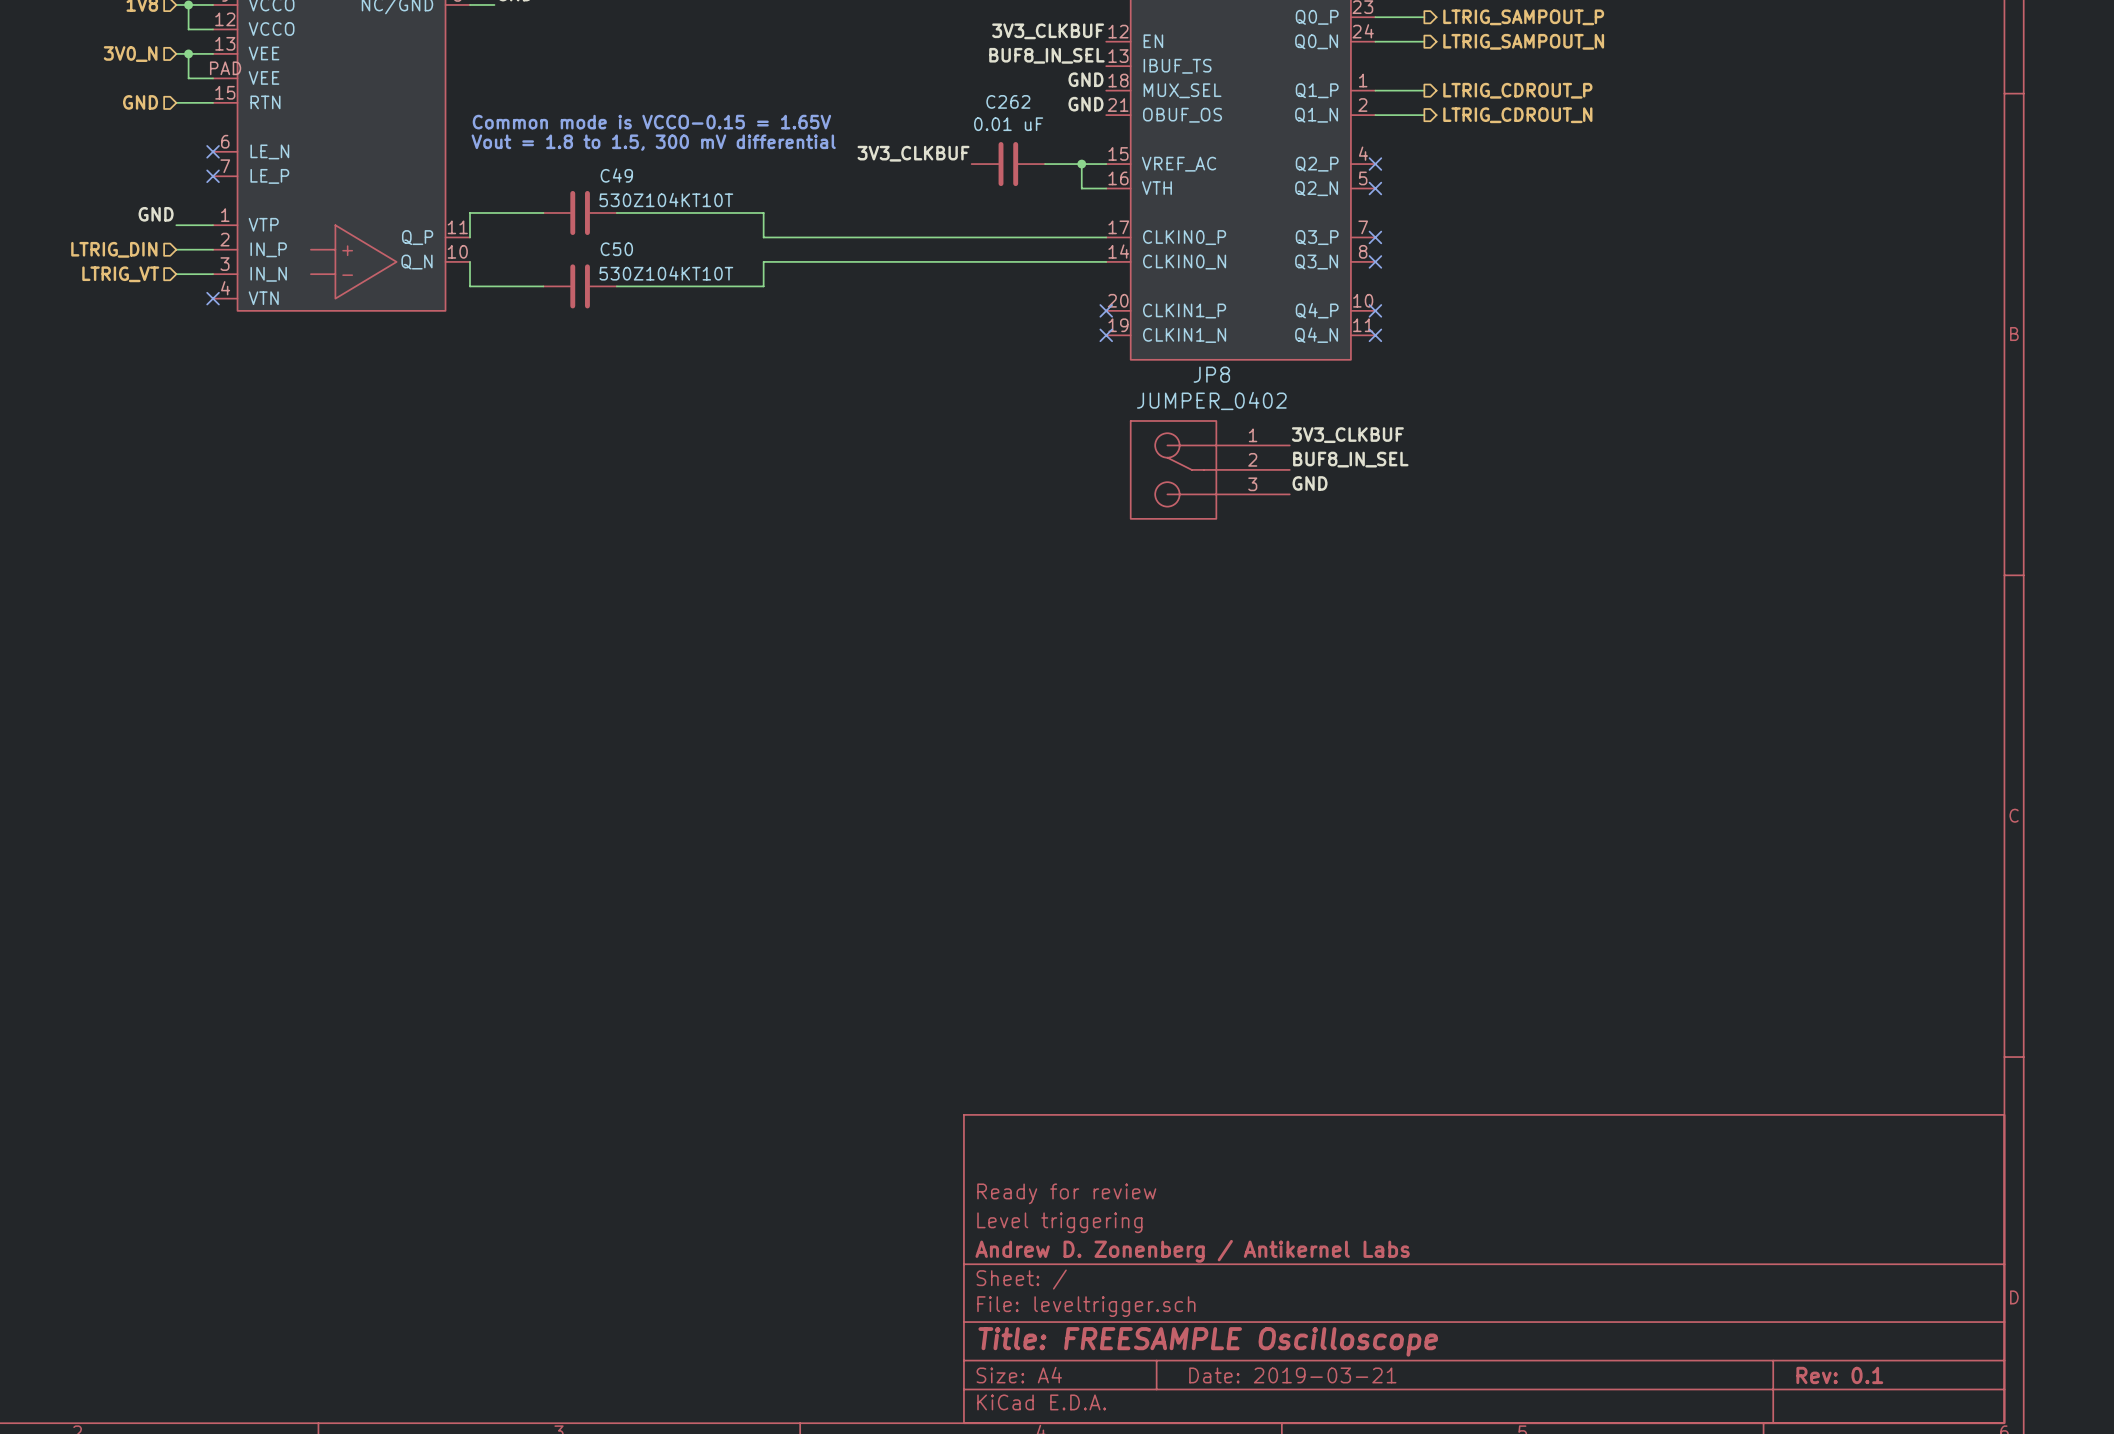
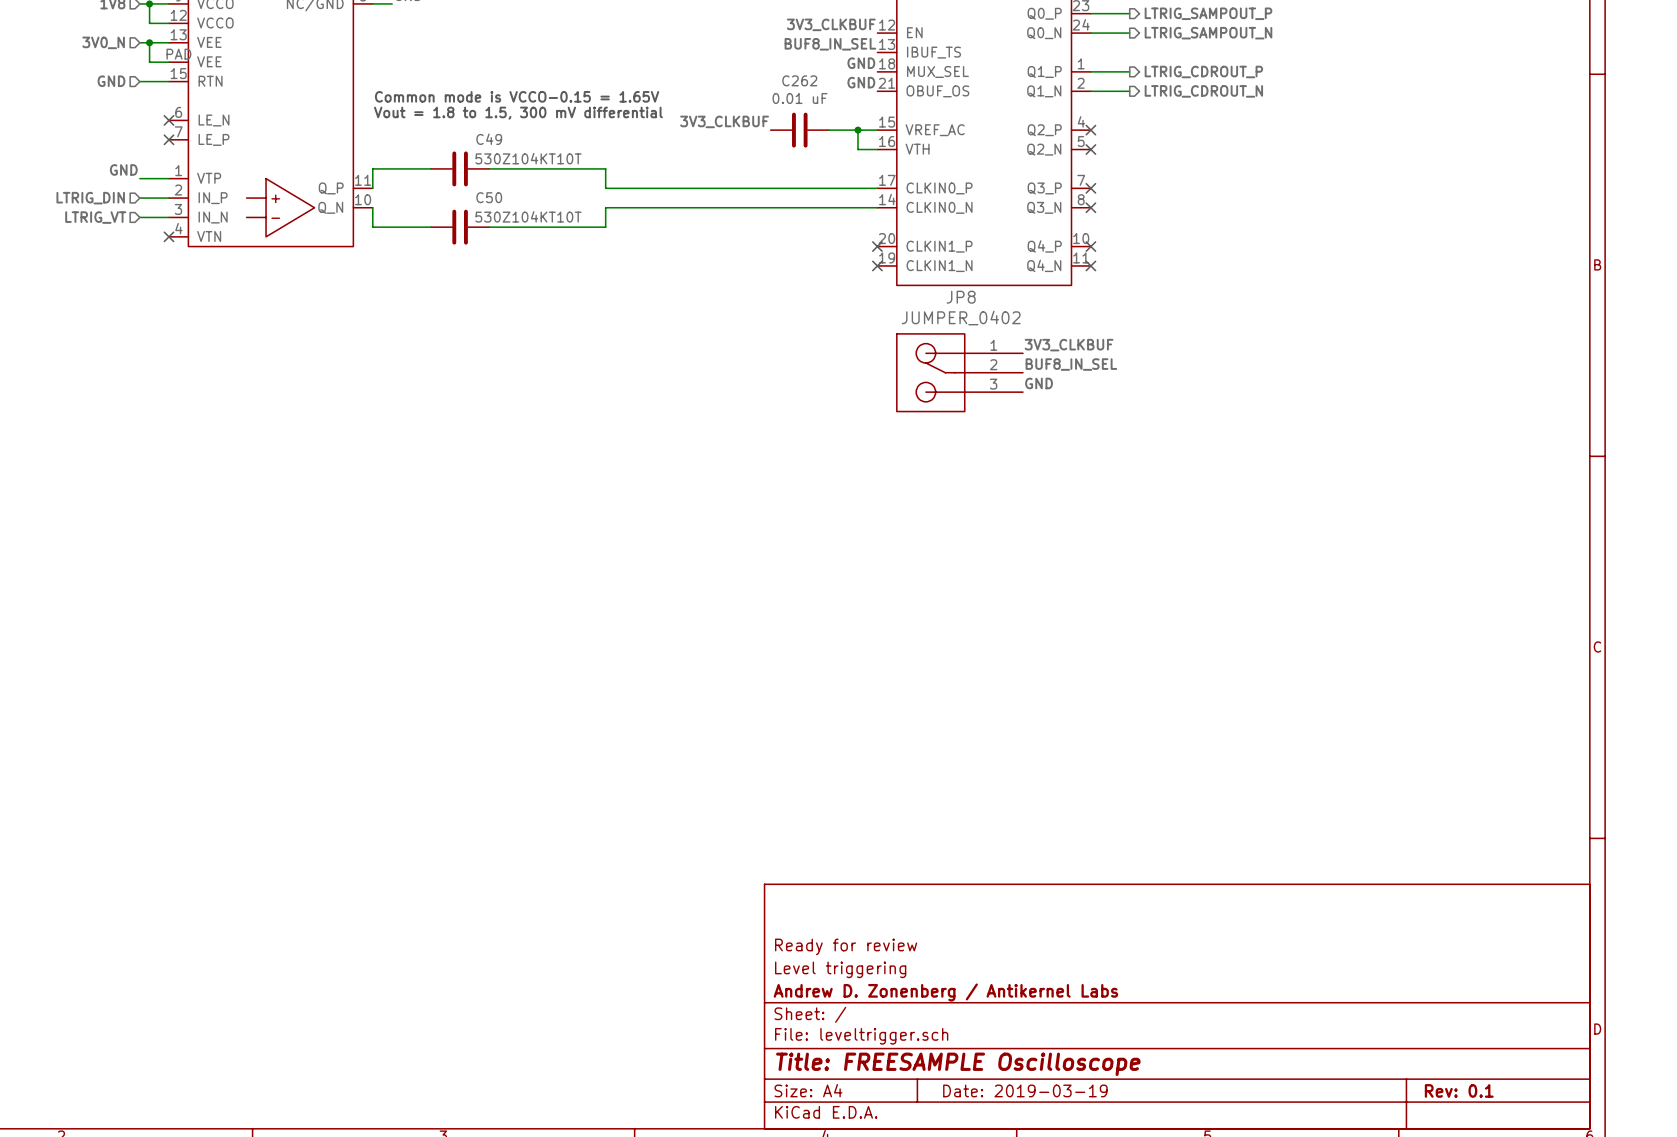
title block: Date: 2019-03-21 (1292, 1375) -> Date: 2019-03-19 (1025, 1090)

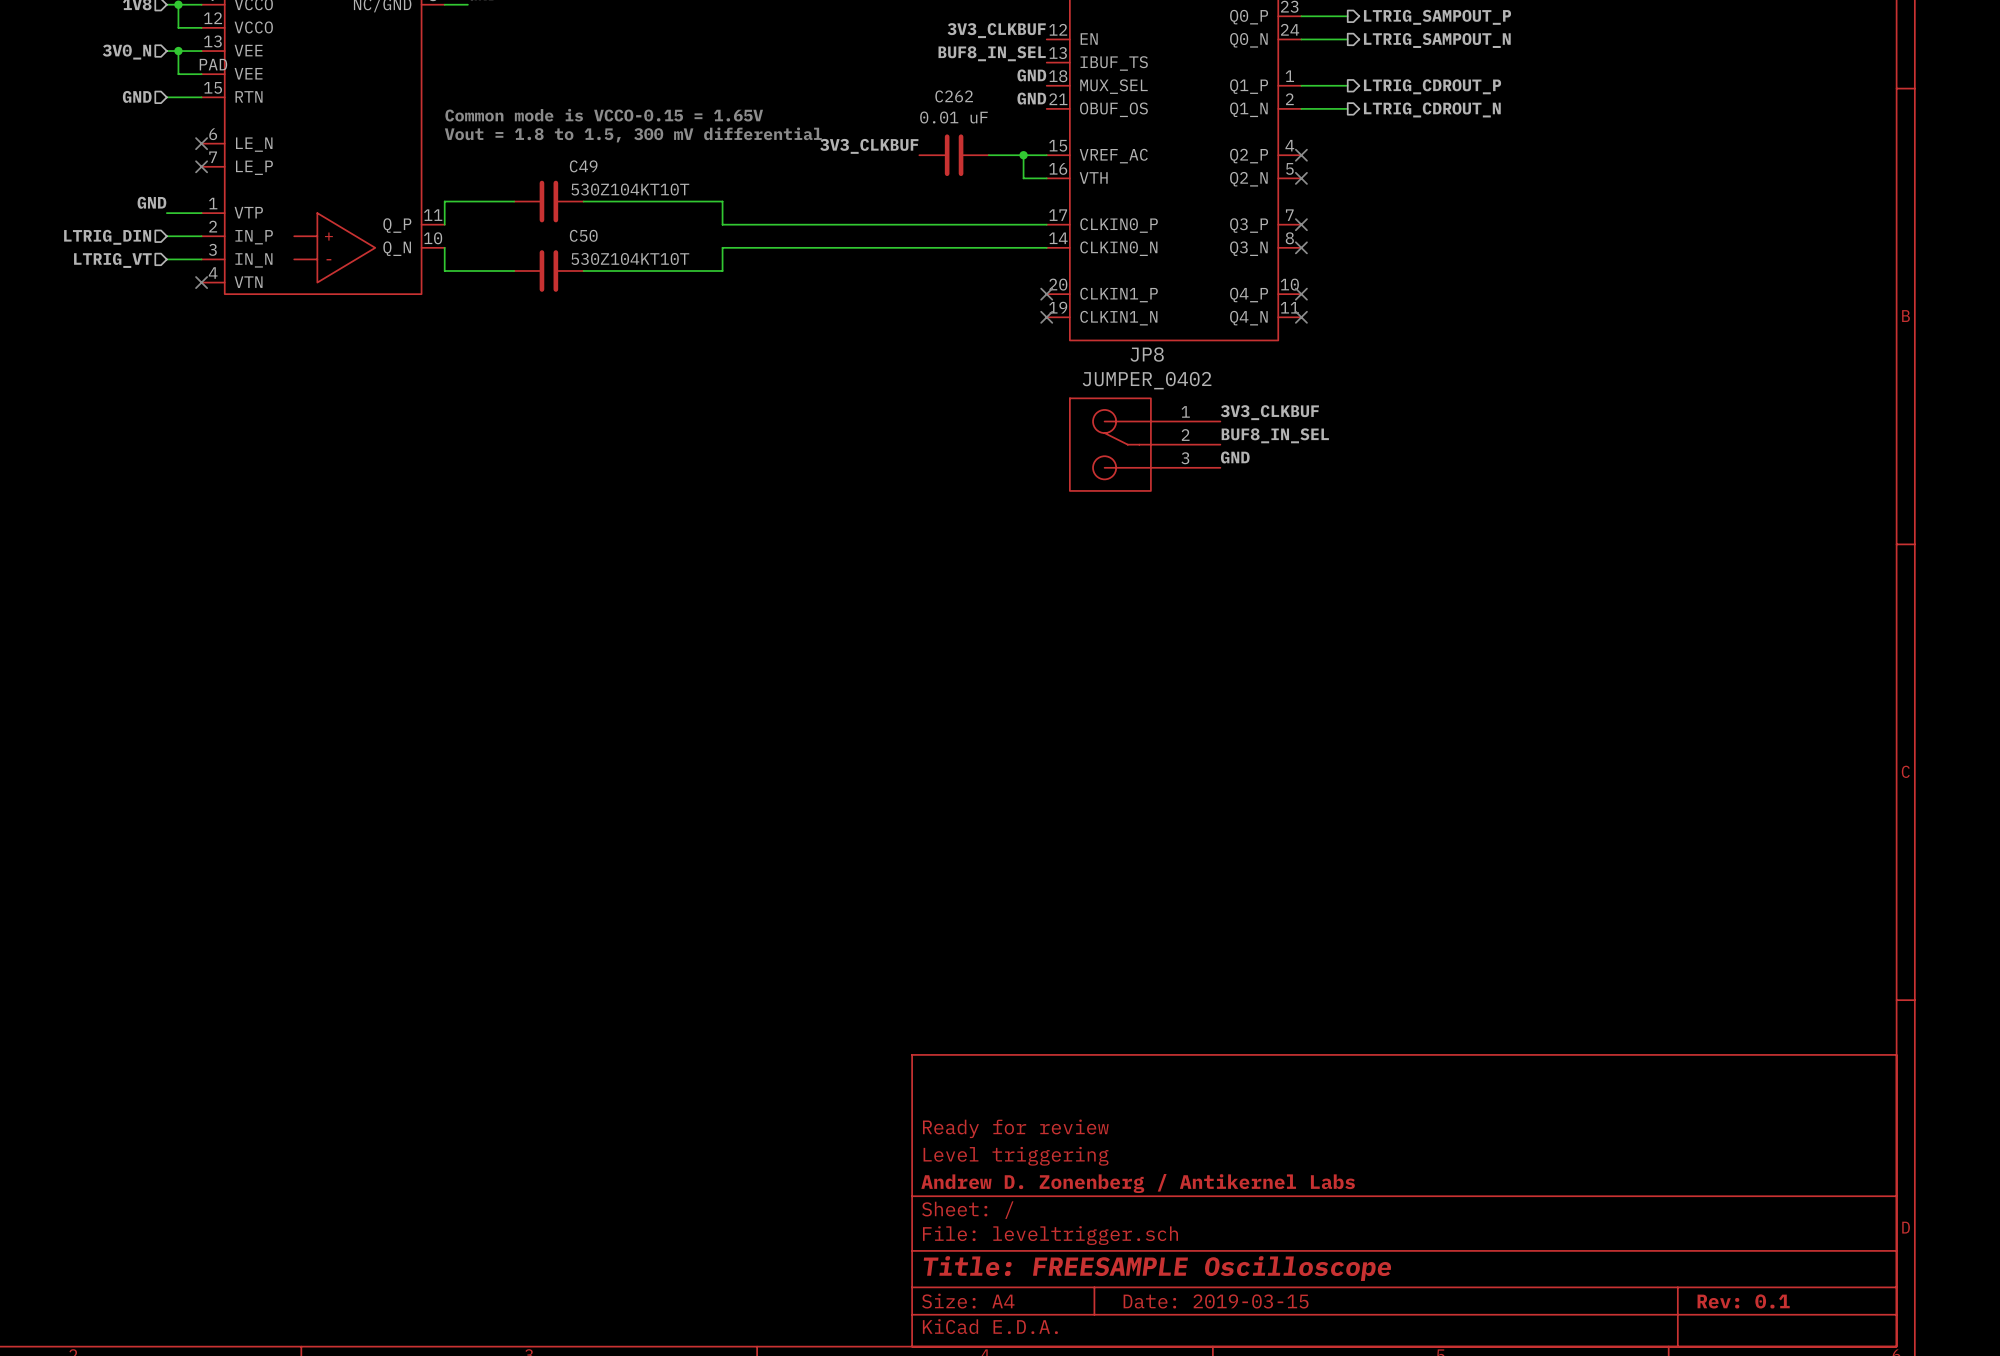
title block: Date: 2019-03-19 (1025, 1090) -> Date: 2019-03-15 (1216, 1301)

